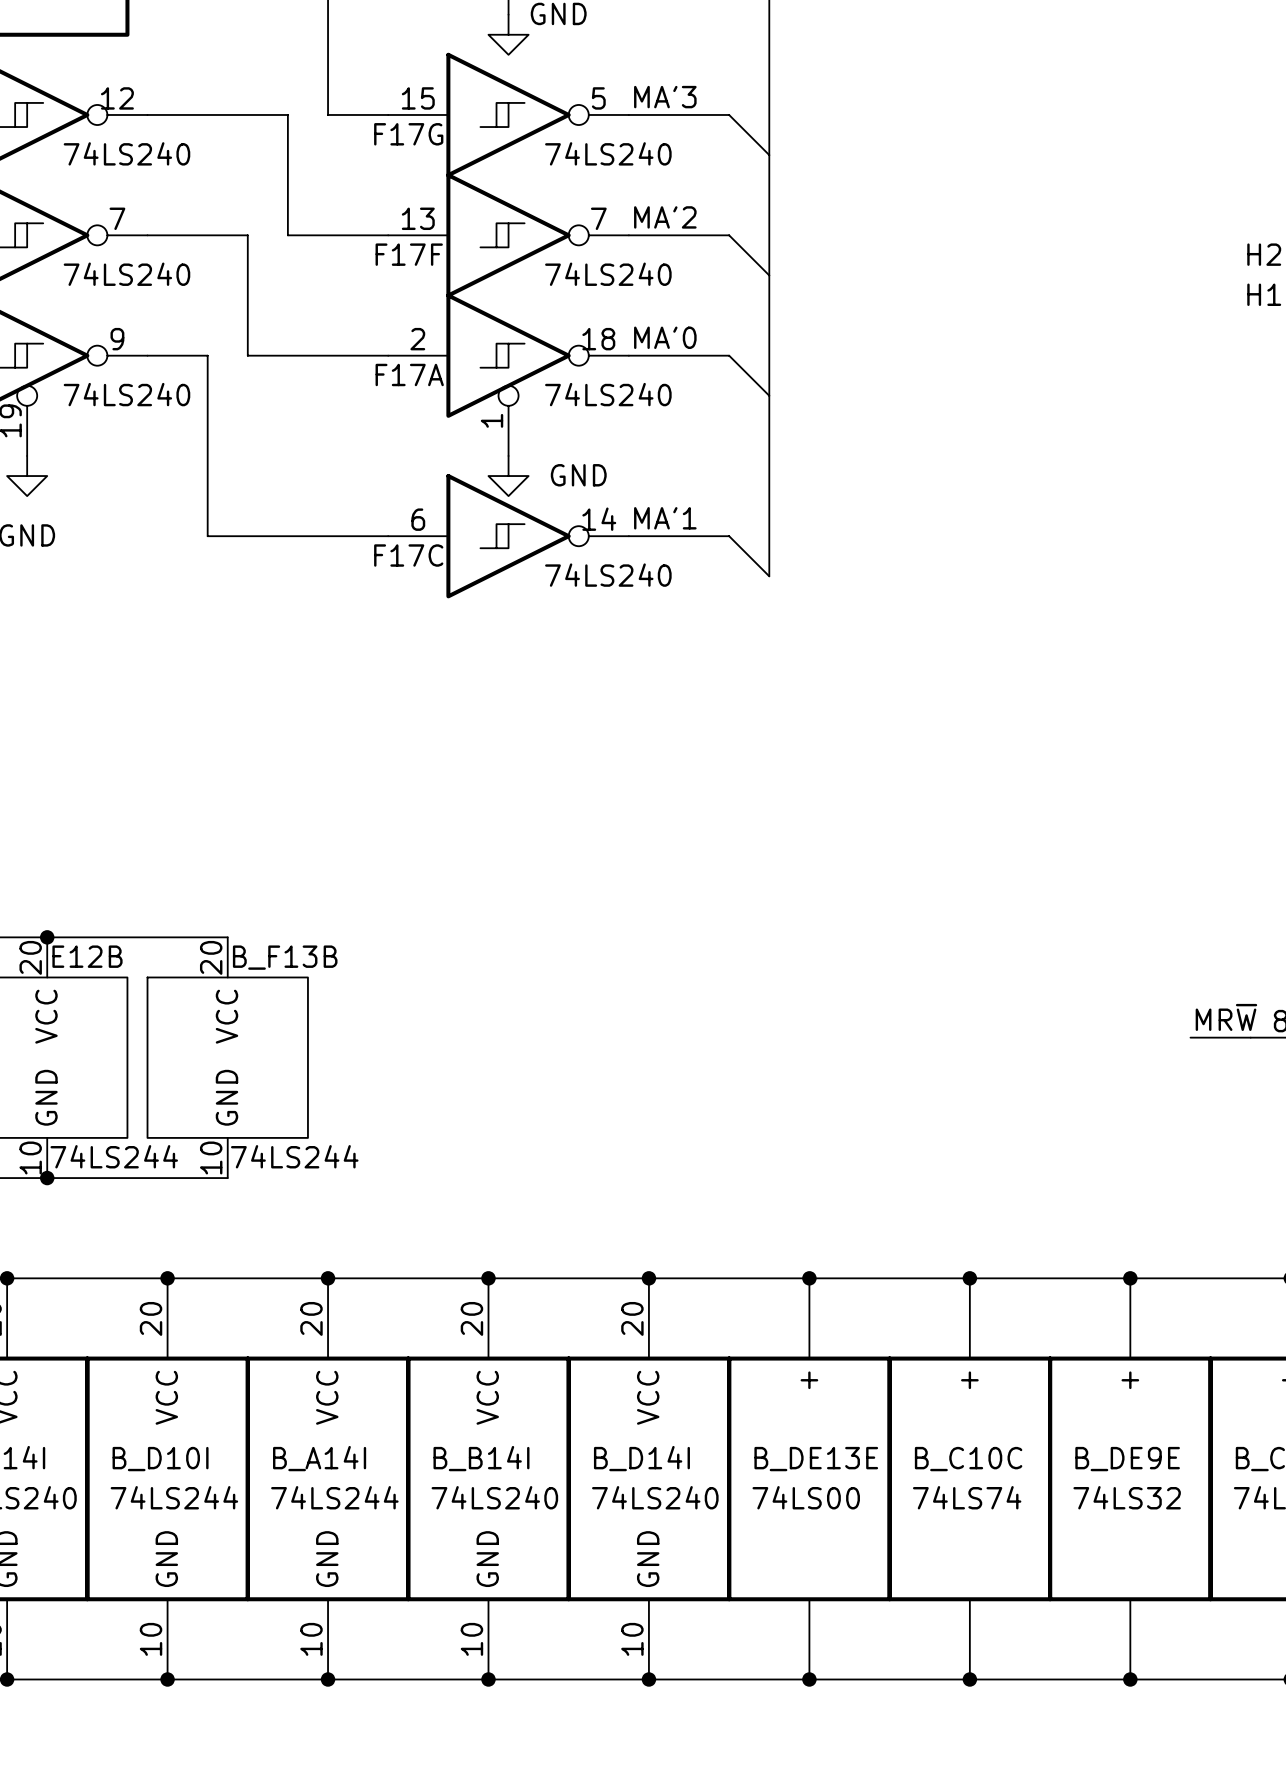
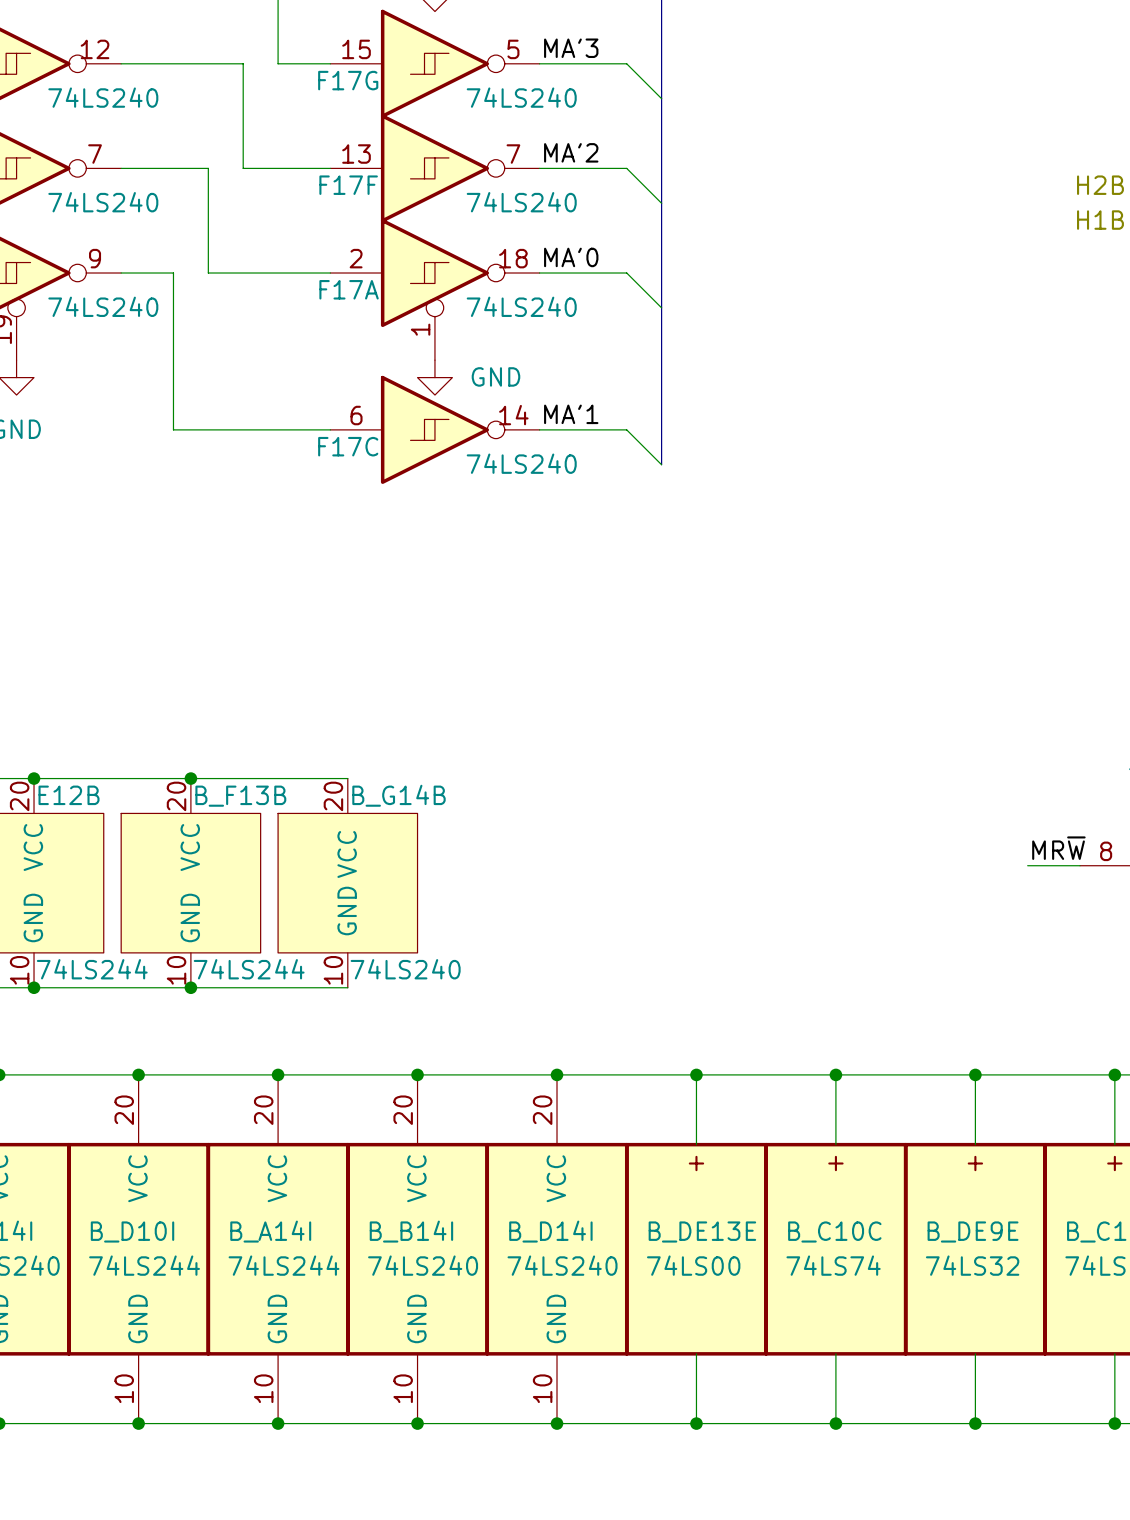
wire: none -> (190, 778) (347, 778)
junction: none -> (190, 778)
B_G14B: none -> 74LS240 (347, 883)
wire: none -> (190, 987) (347, 987)
junction: none -> (190, 987)

